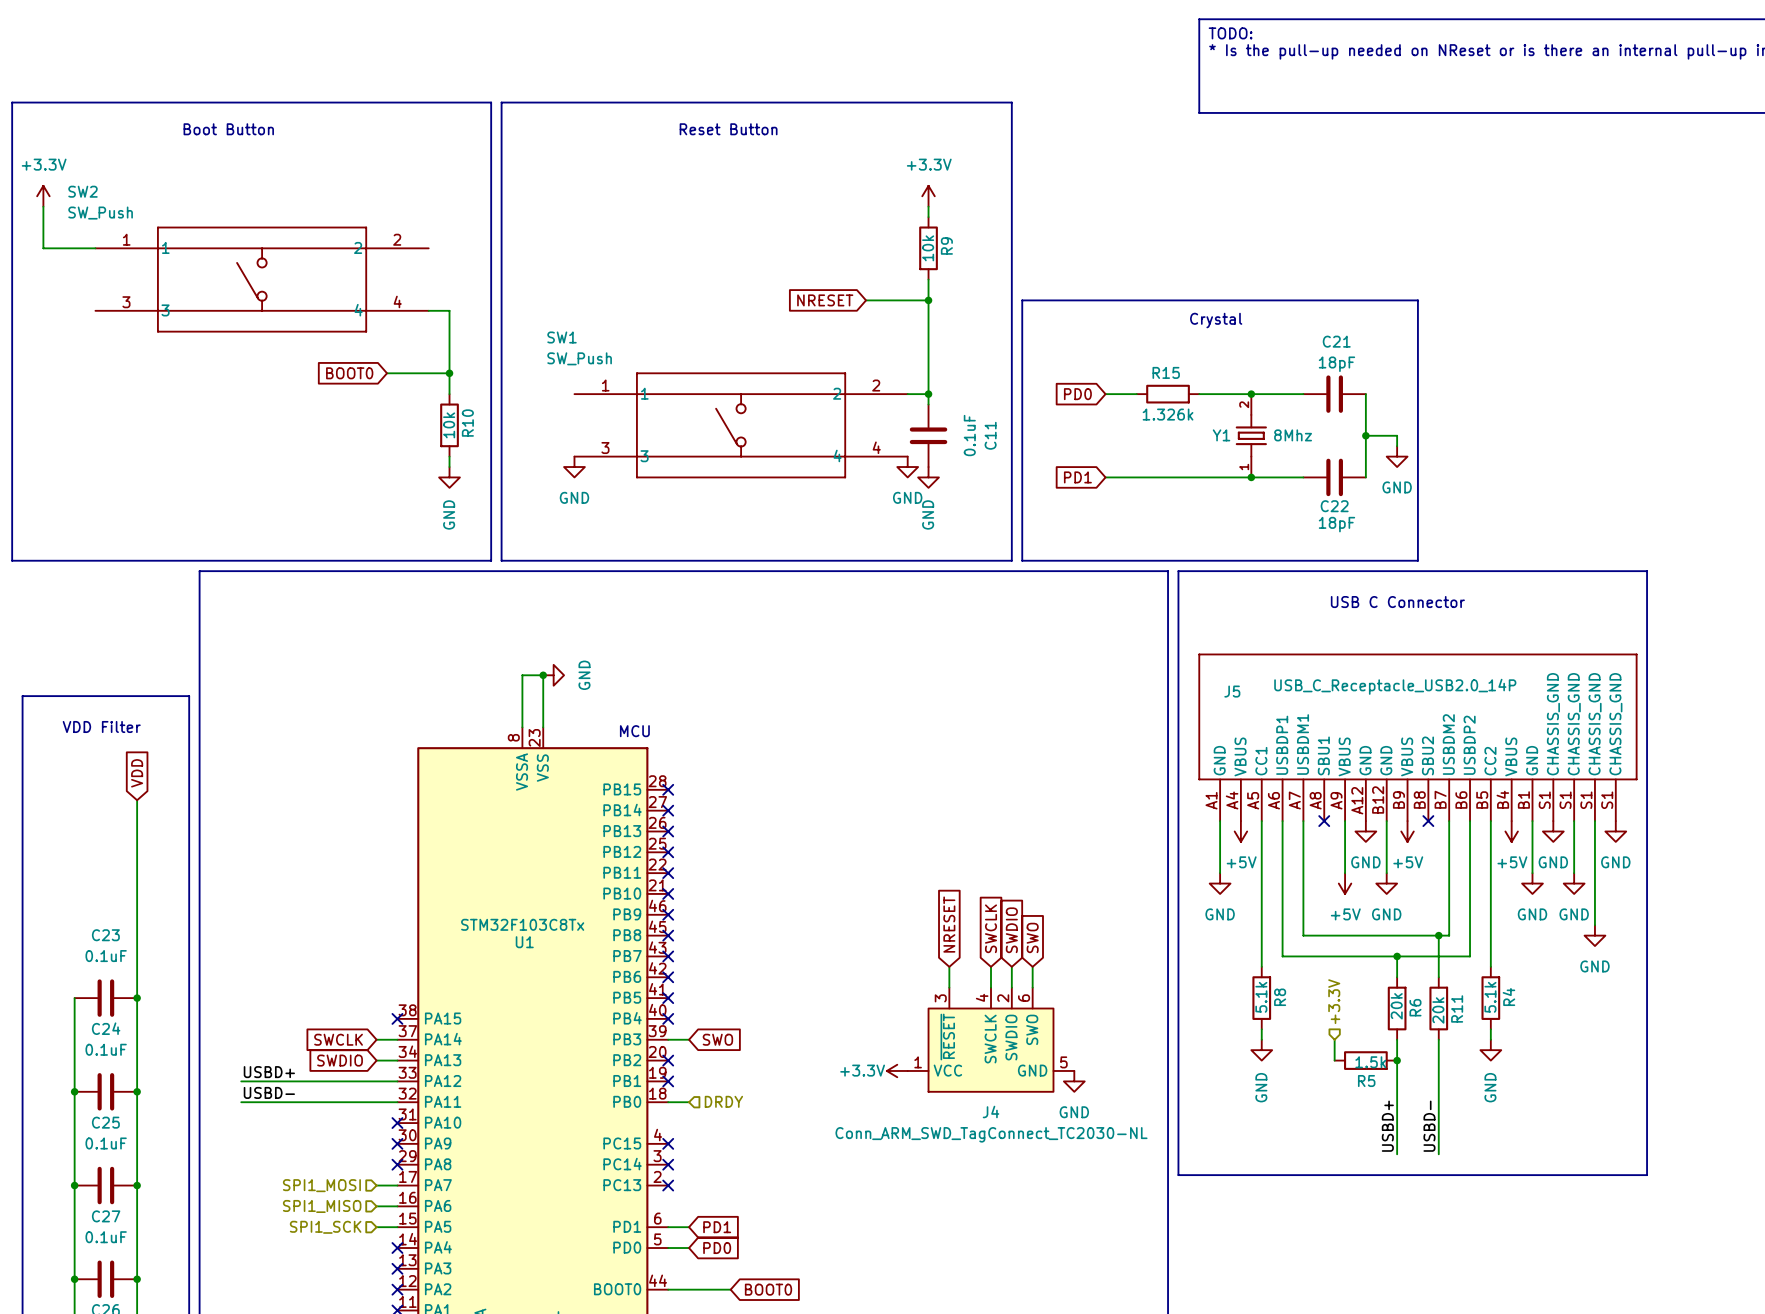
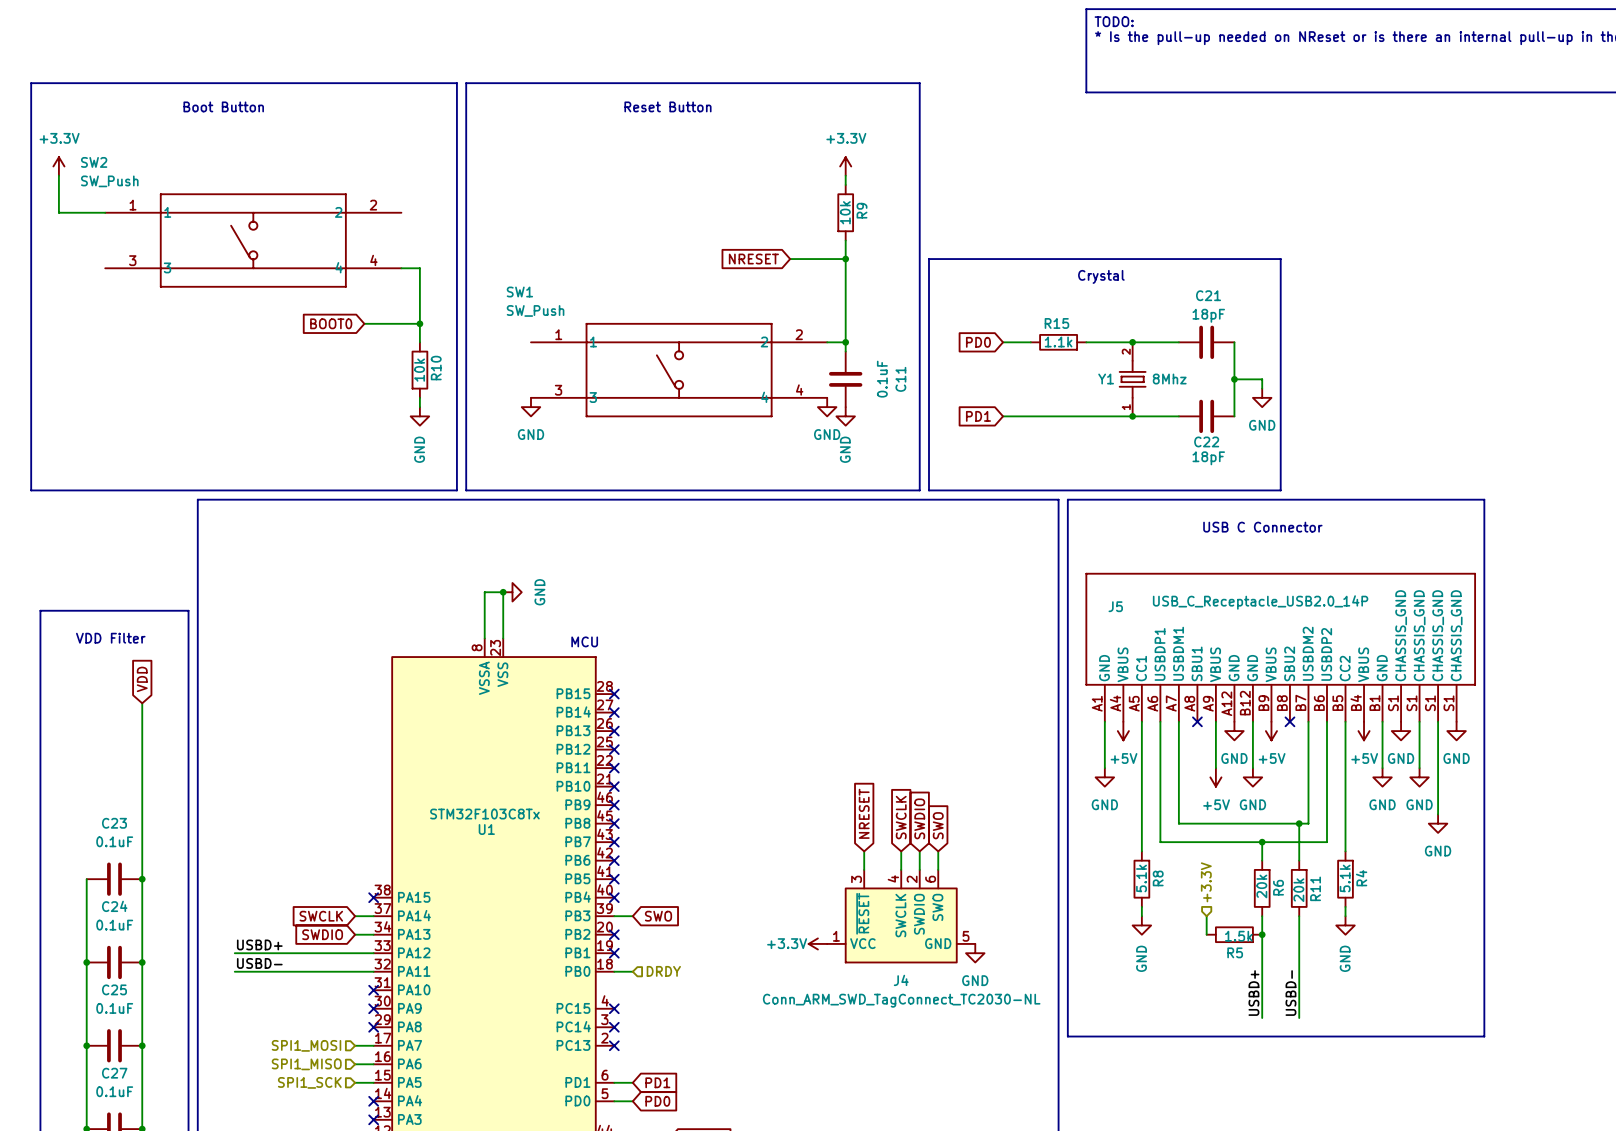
R15 value: 1.326k (1168, 414) -> 1.1k (1058, 341)

